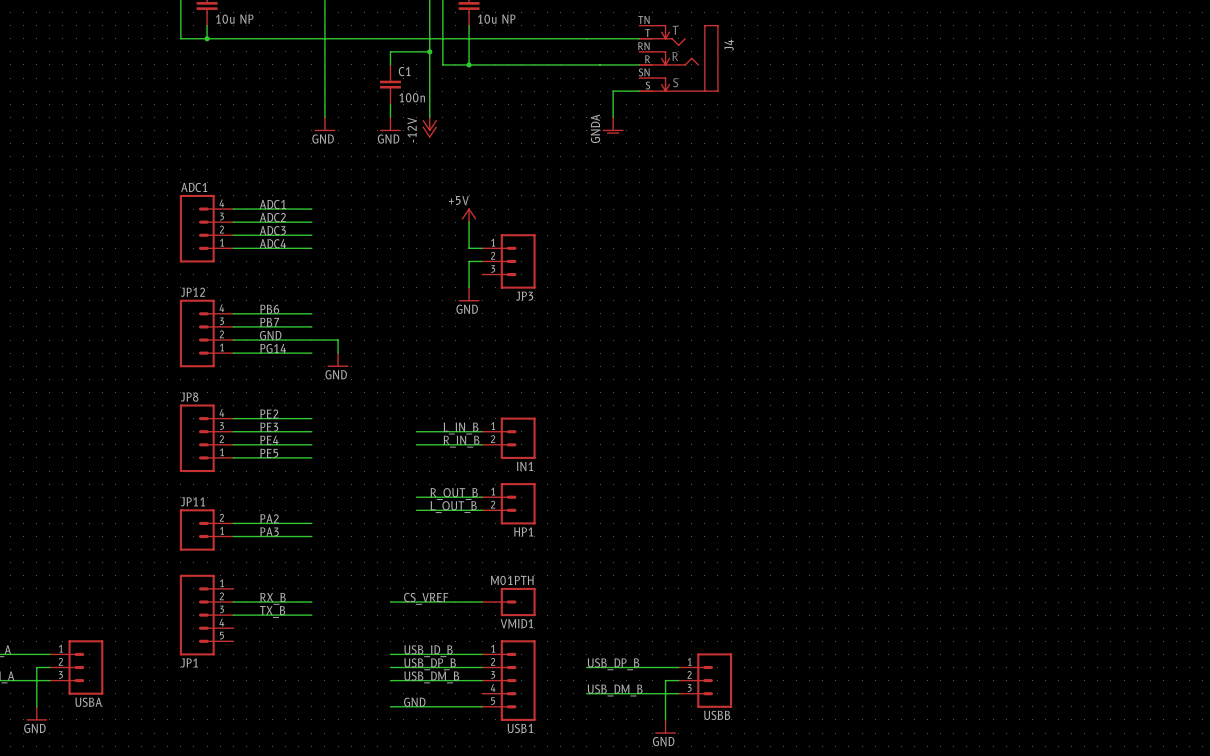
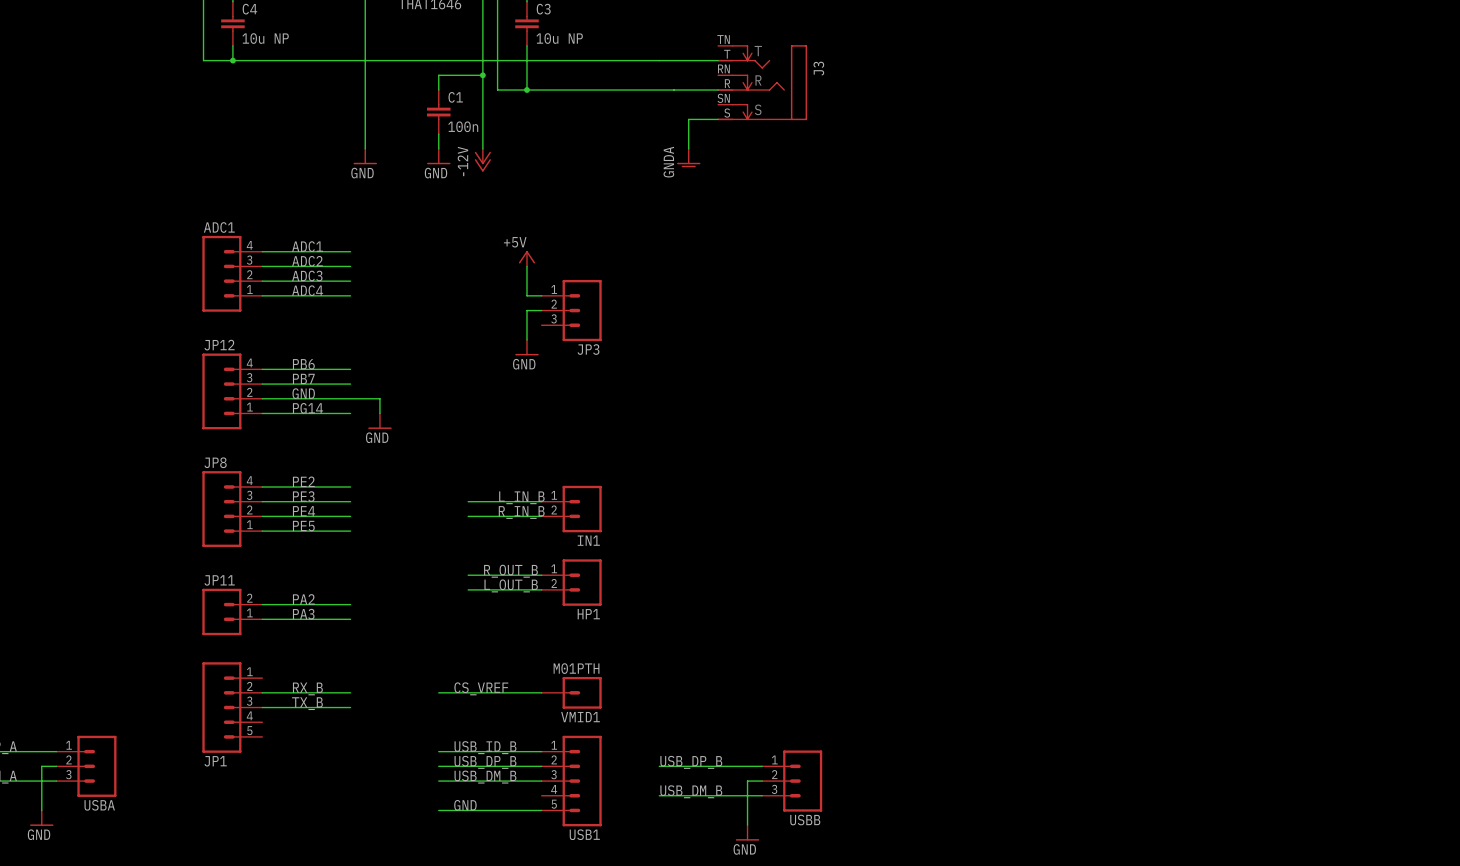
J4 name: J4 (729, 45) -> J3 (818, 68)

